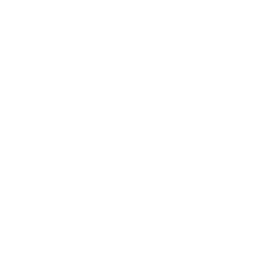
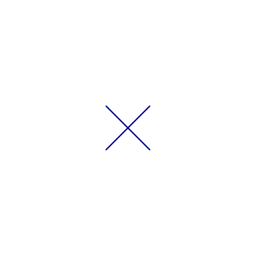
no-connect mark: none -> (127, 127)

